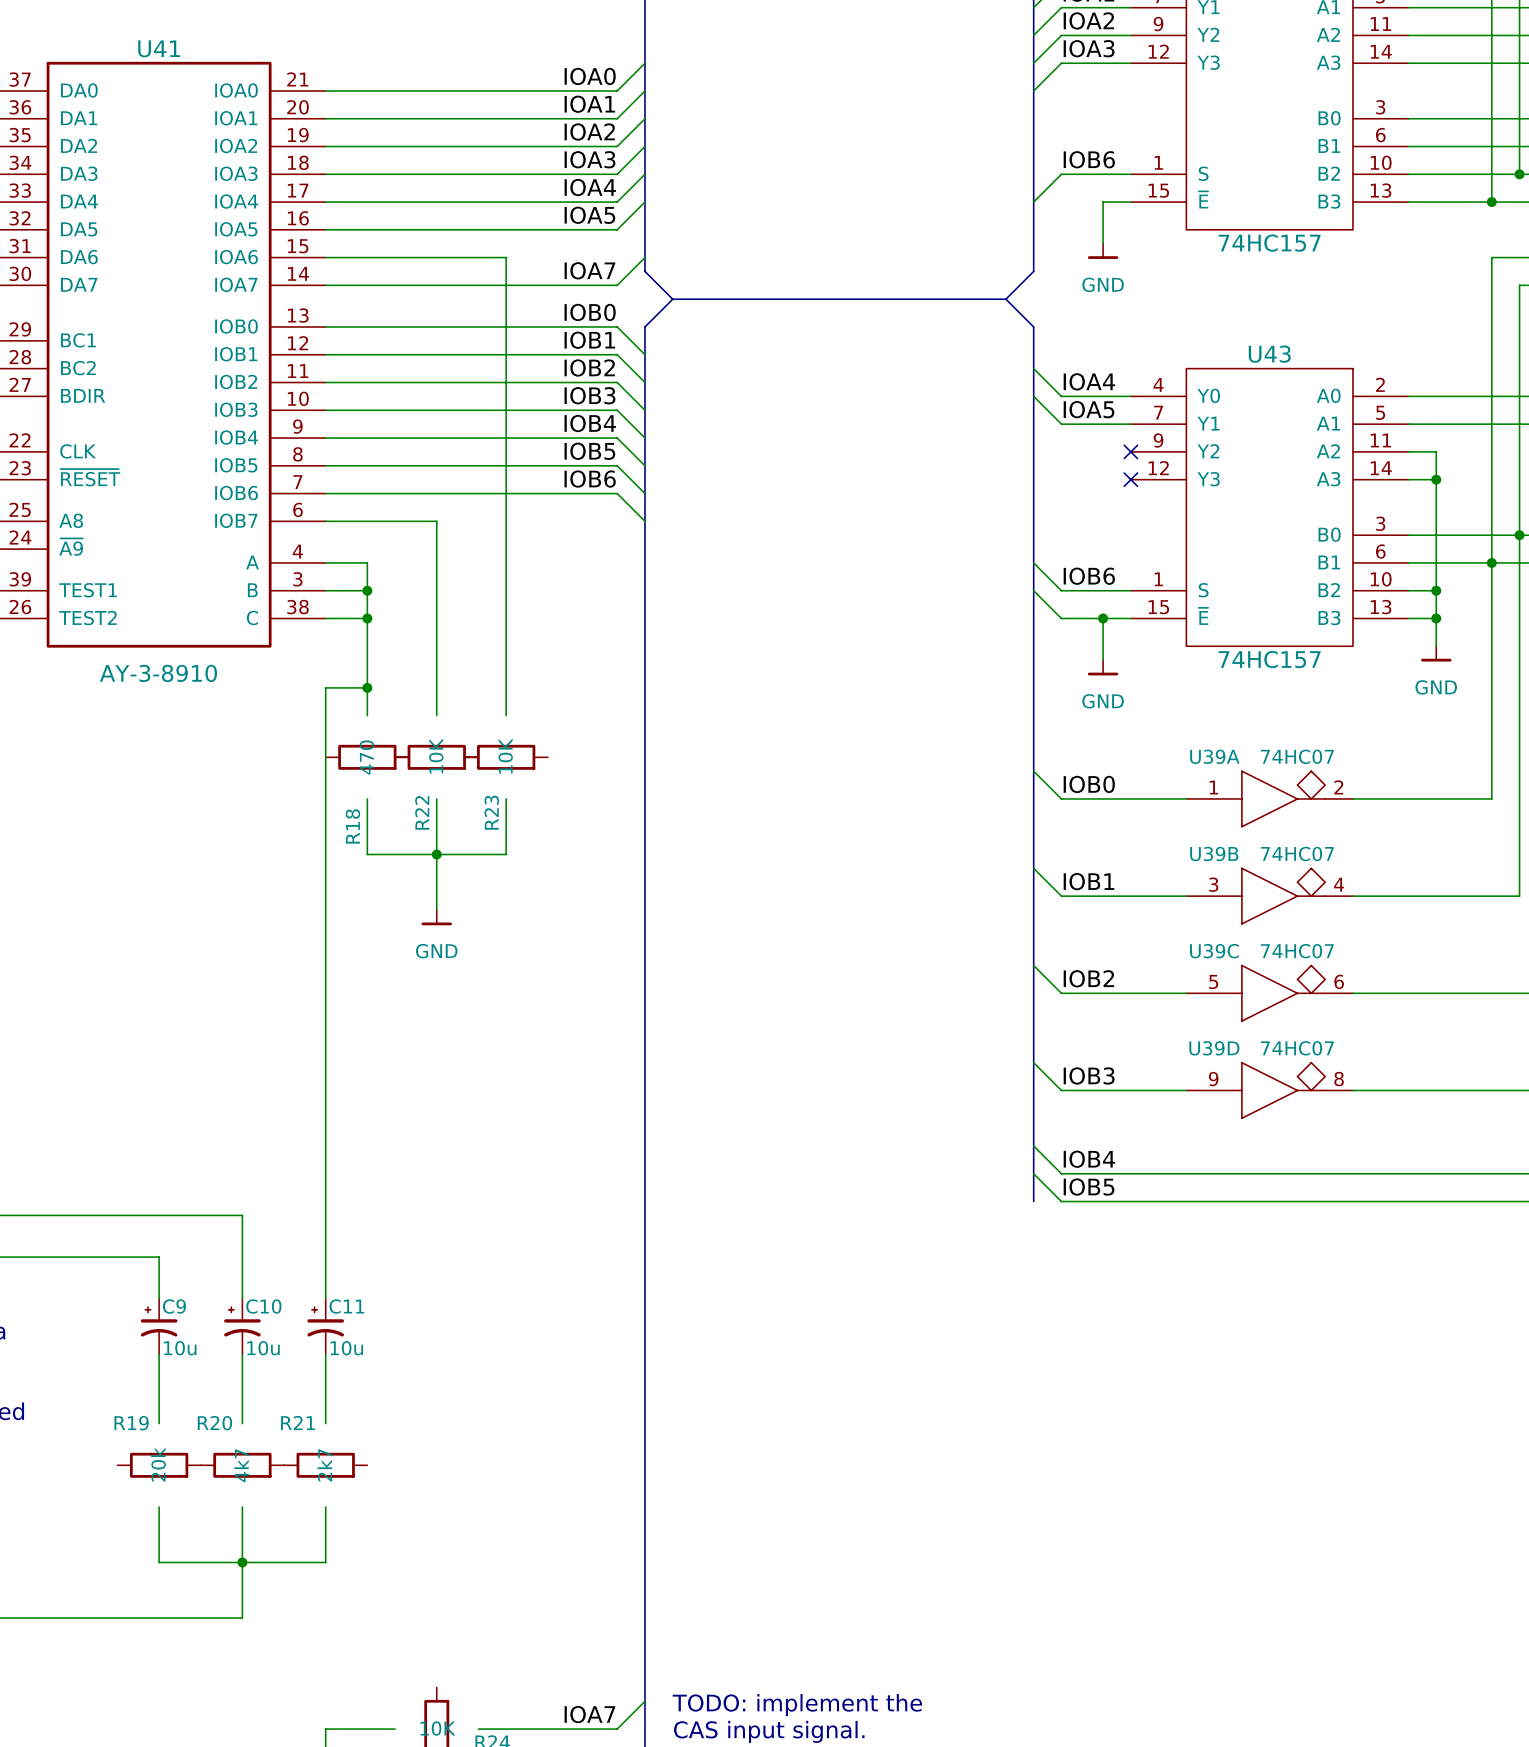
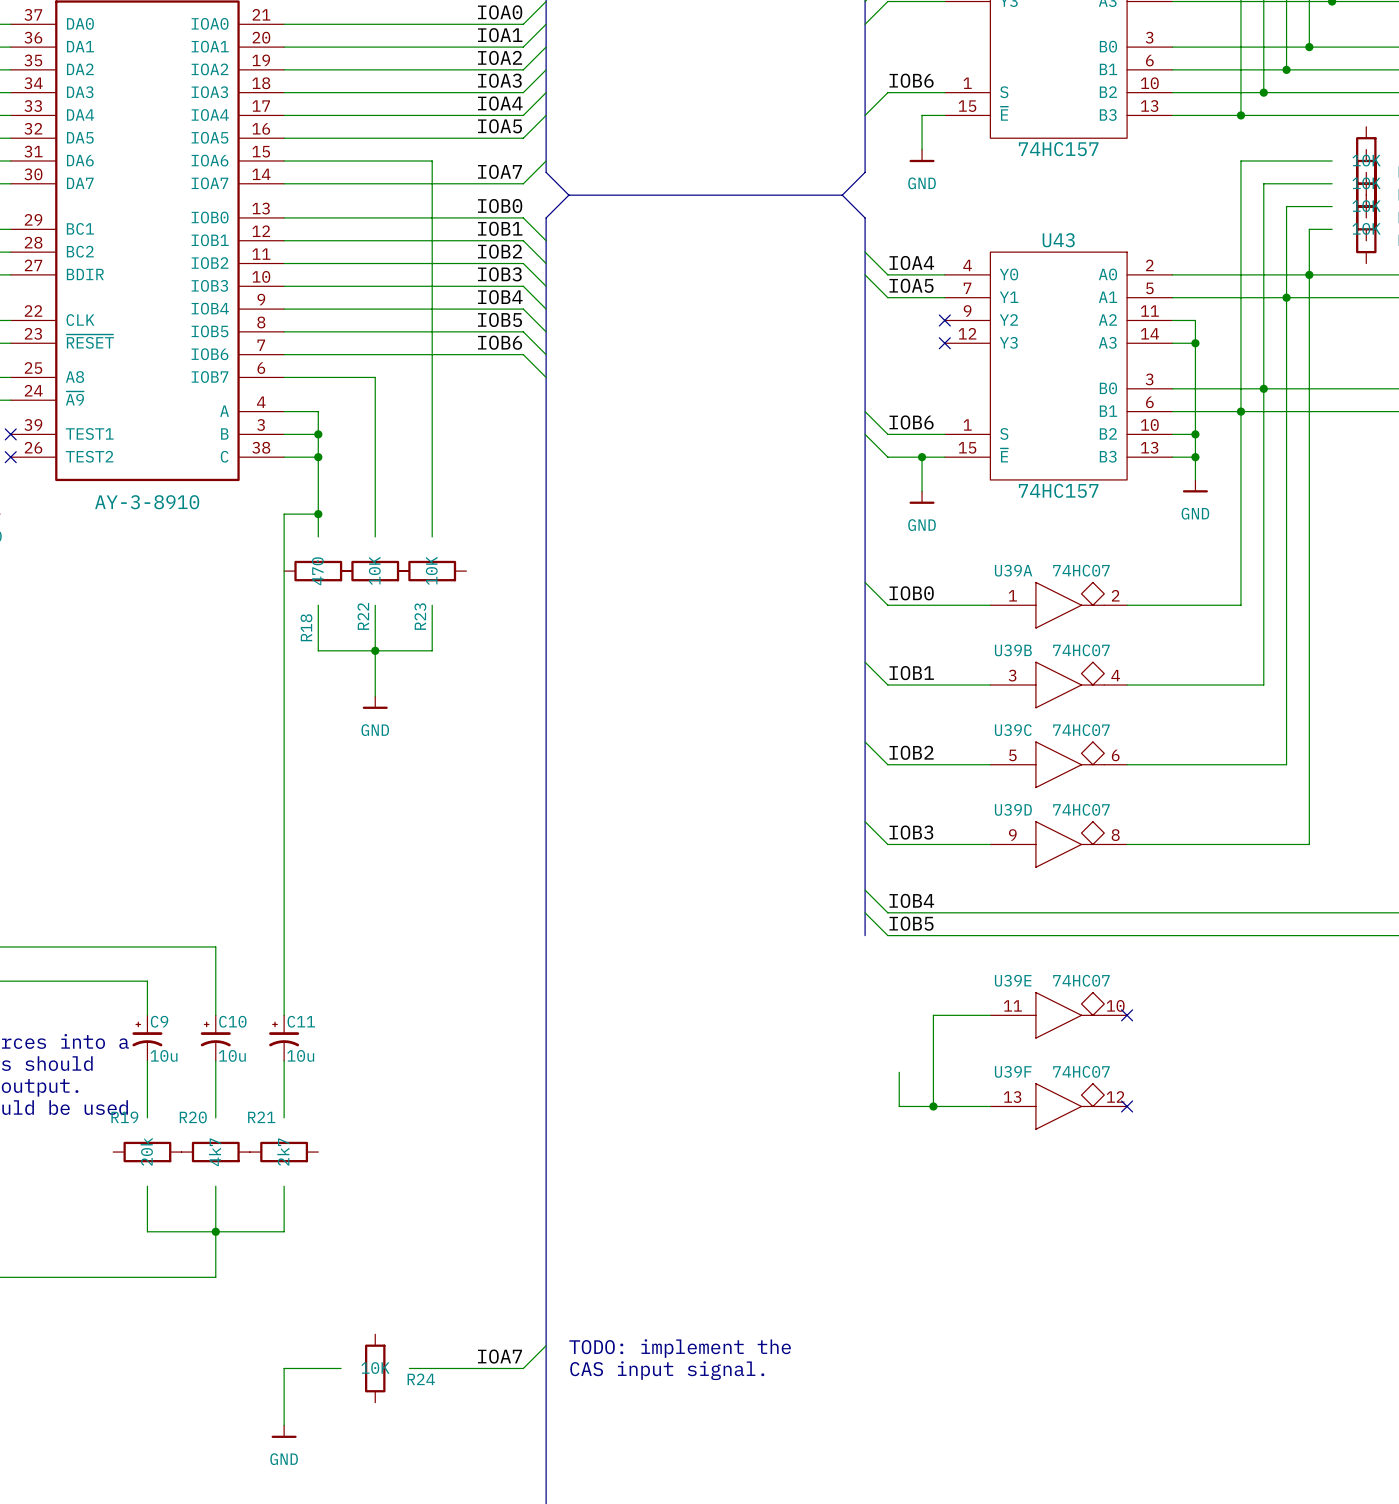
wire: none -> (990, 1015) (933, 1015) (933, 1106)
U39E: none -> 74HC07 (1058, 1015)
no-connect mark: none -> (1127, 1015)
wire: none -> (899, 1072) (899, 1106) (990, 1106)
junction: none -> (933, 1106)
U39F: none -> 74HC07 (1058, 1106)
no-connect mark: none -> (1127, 1106)

